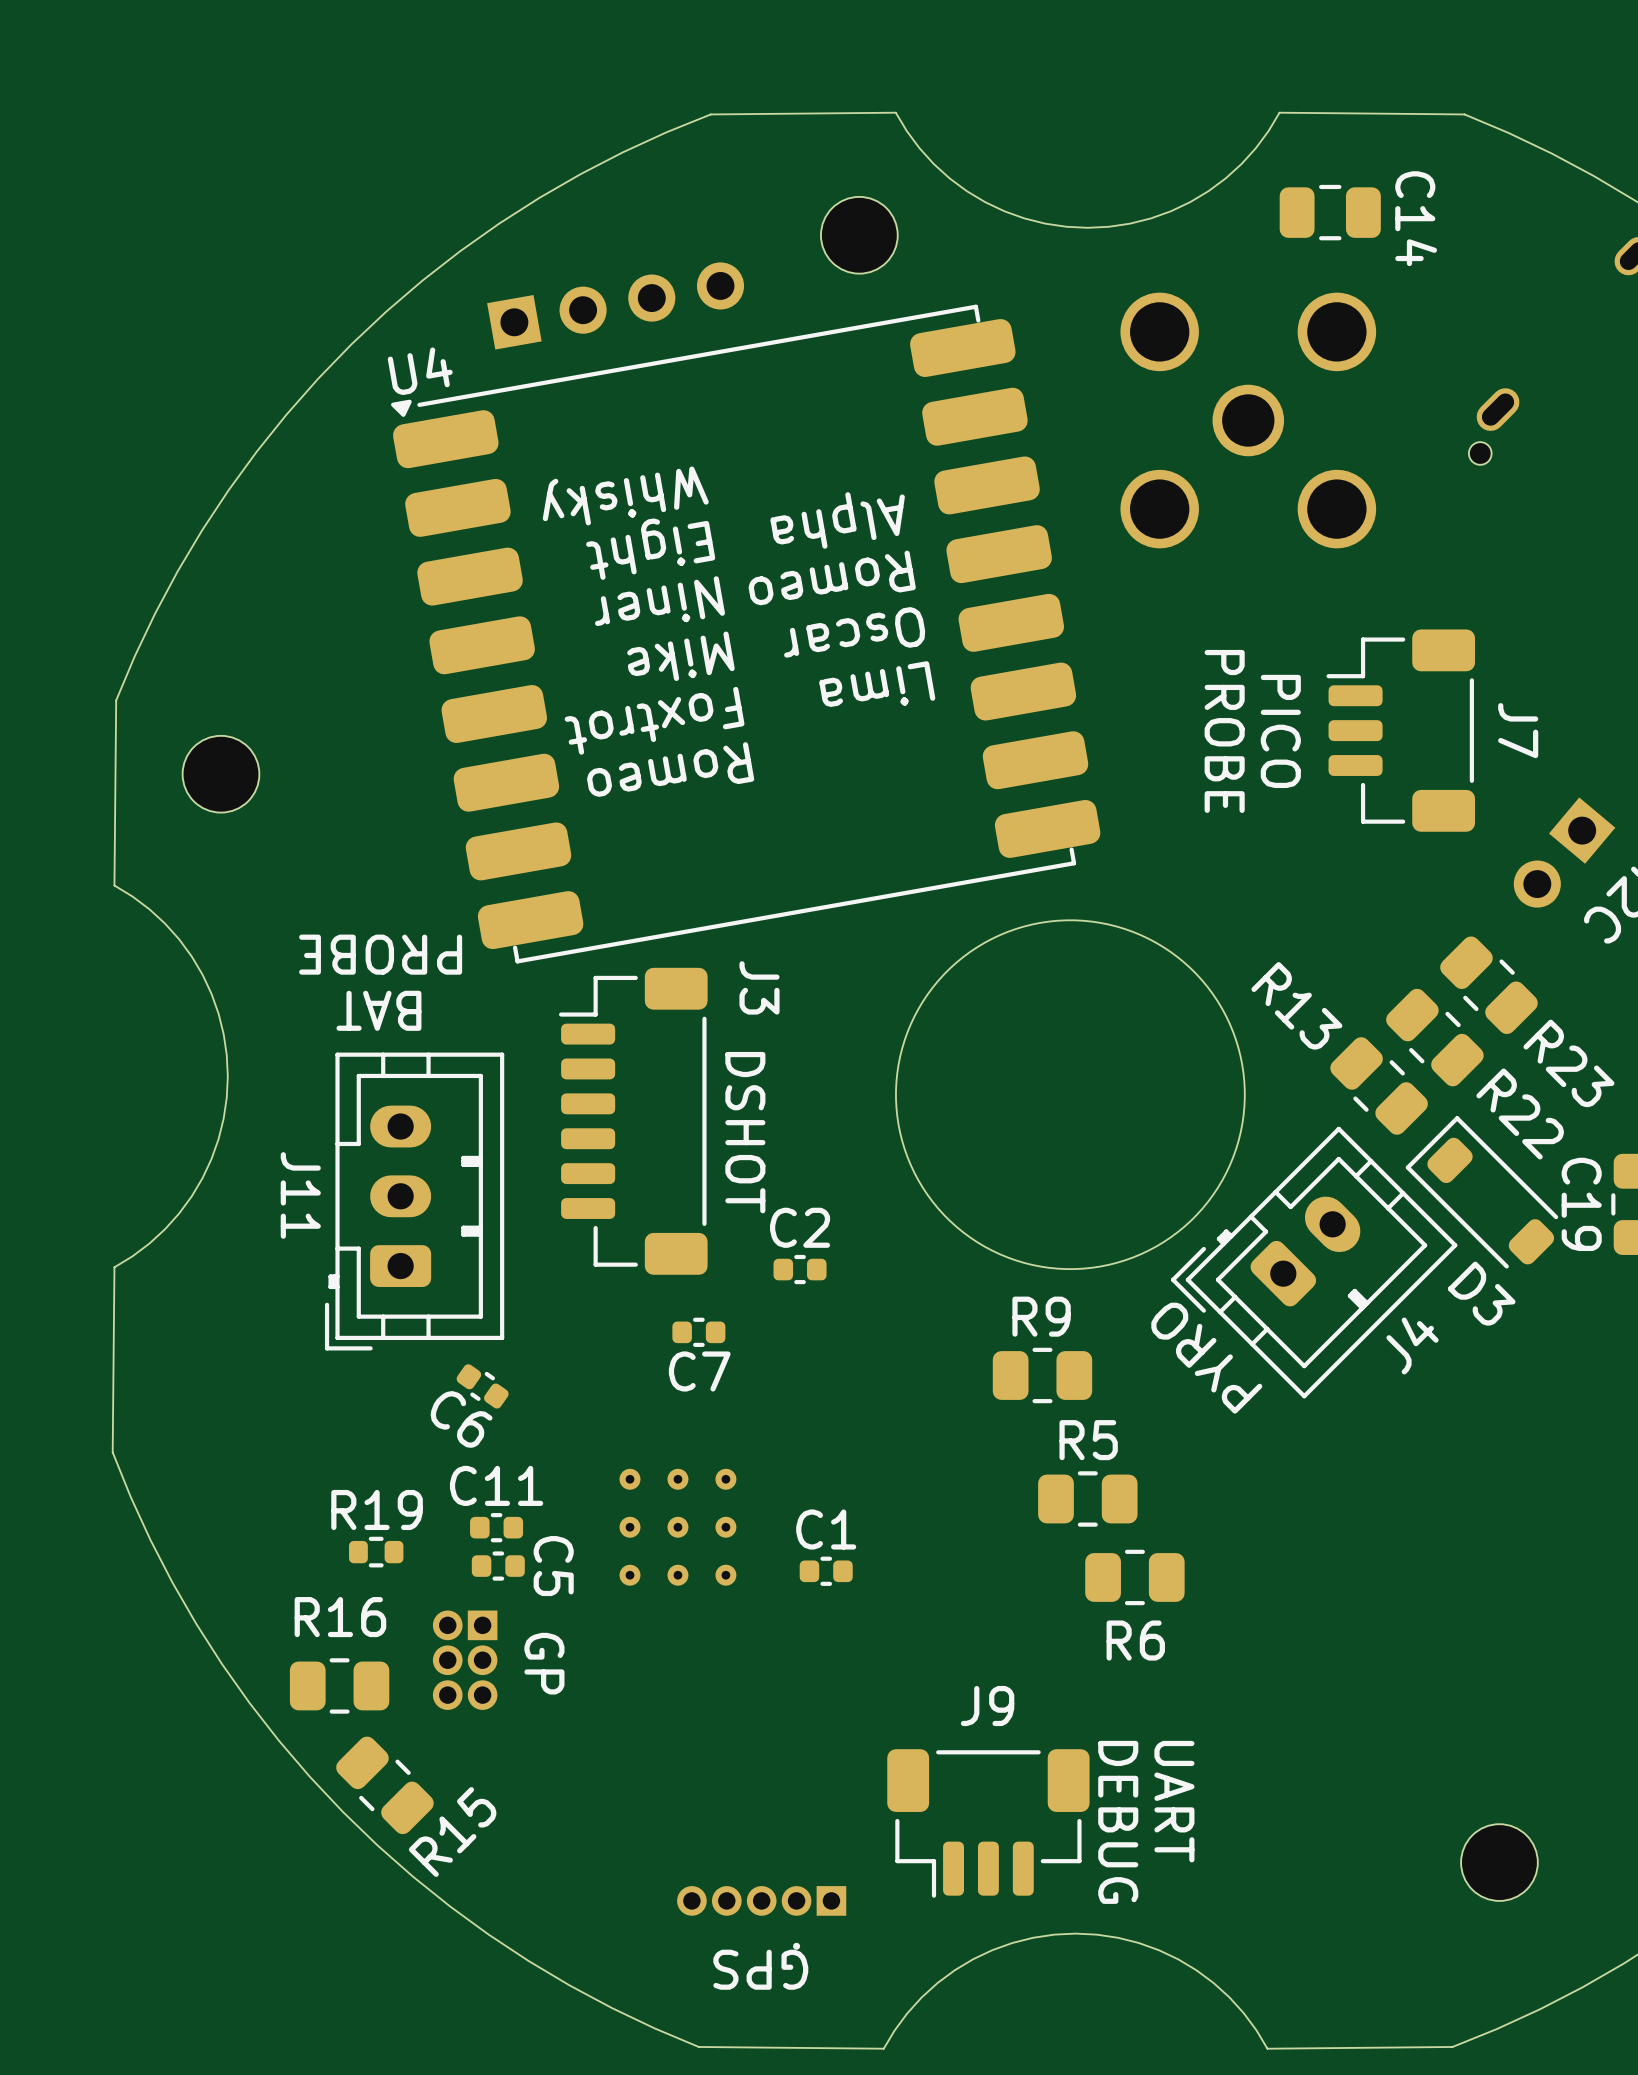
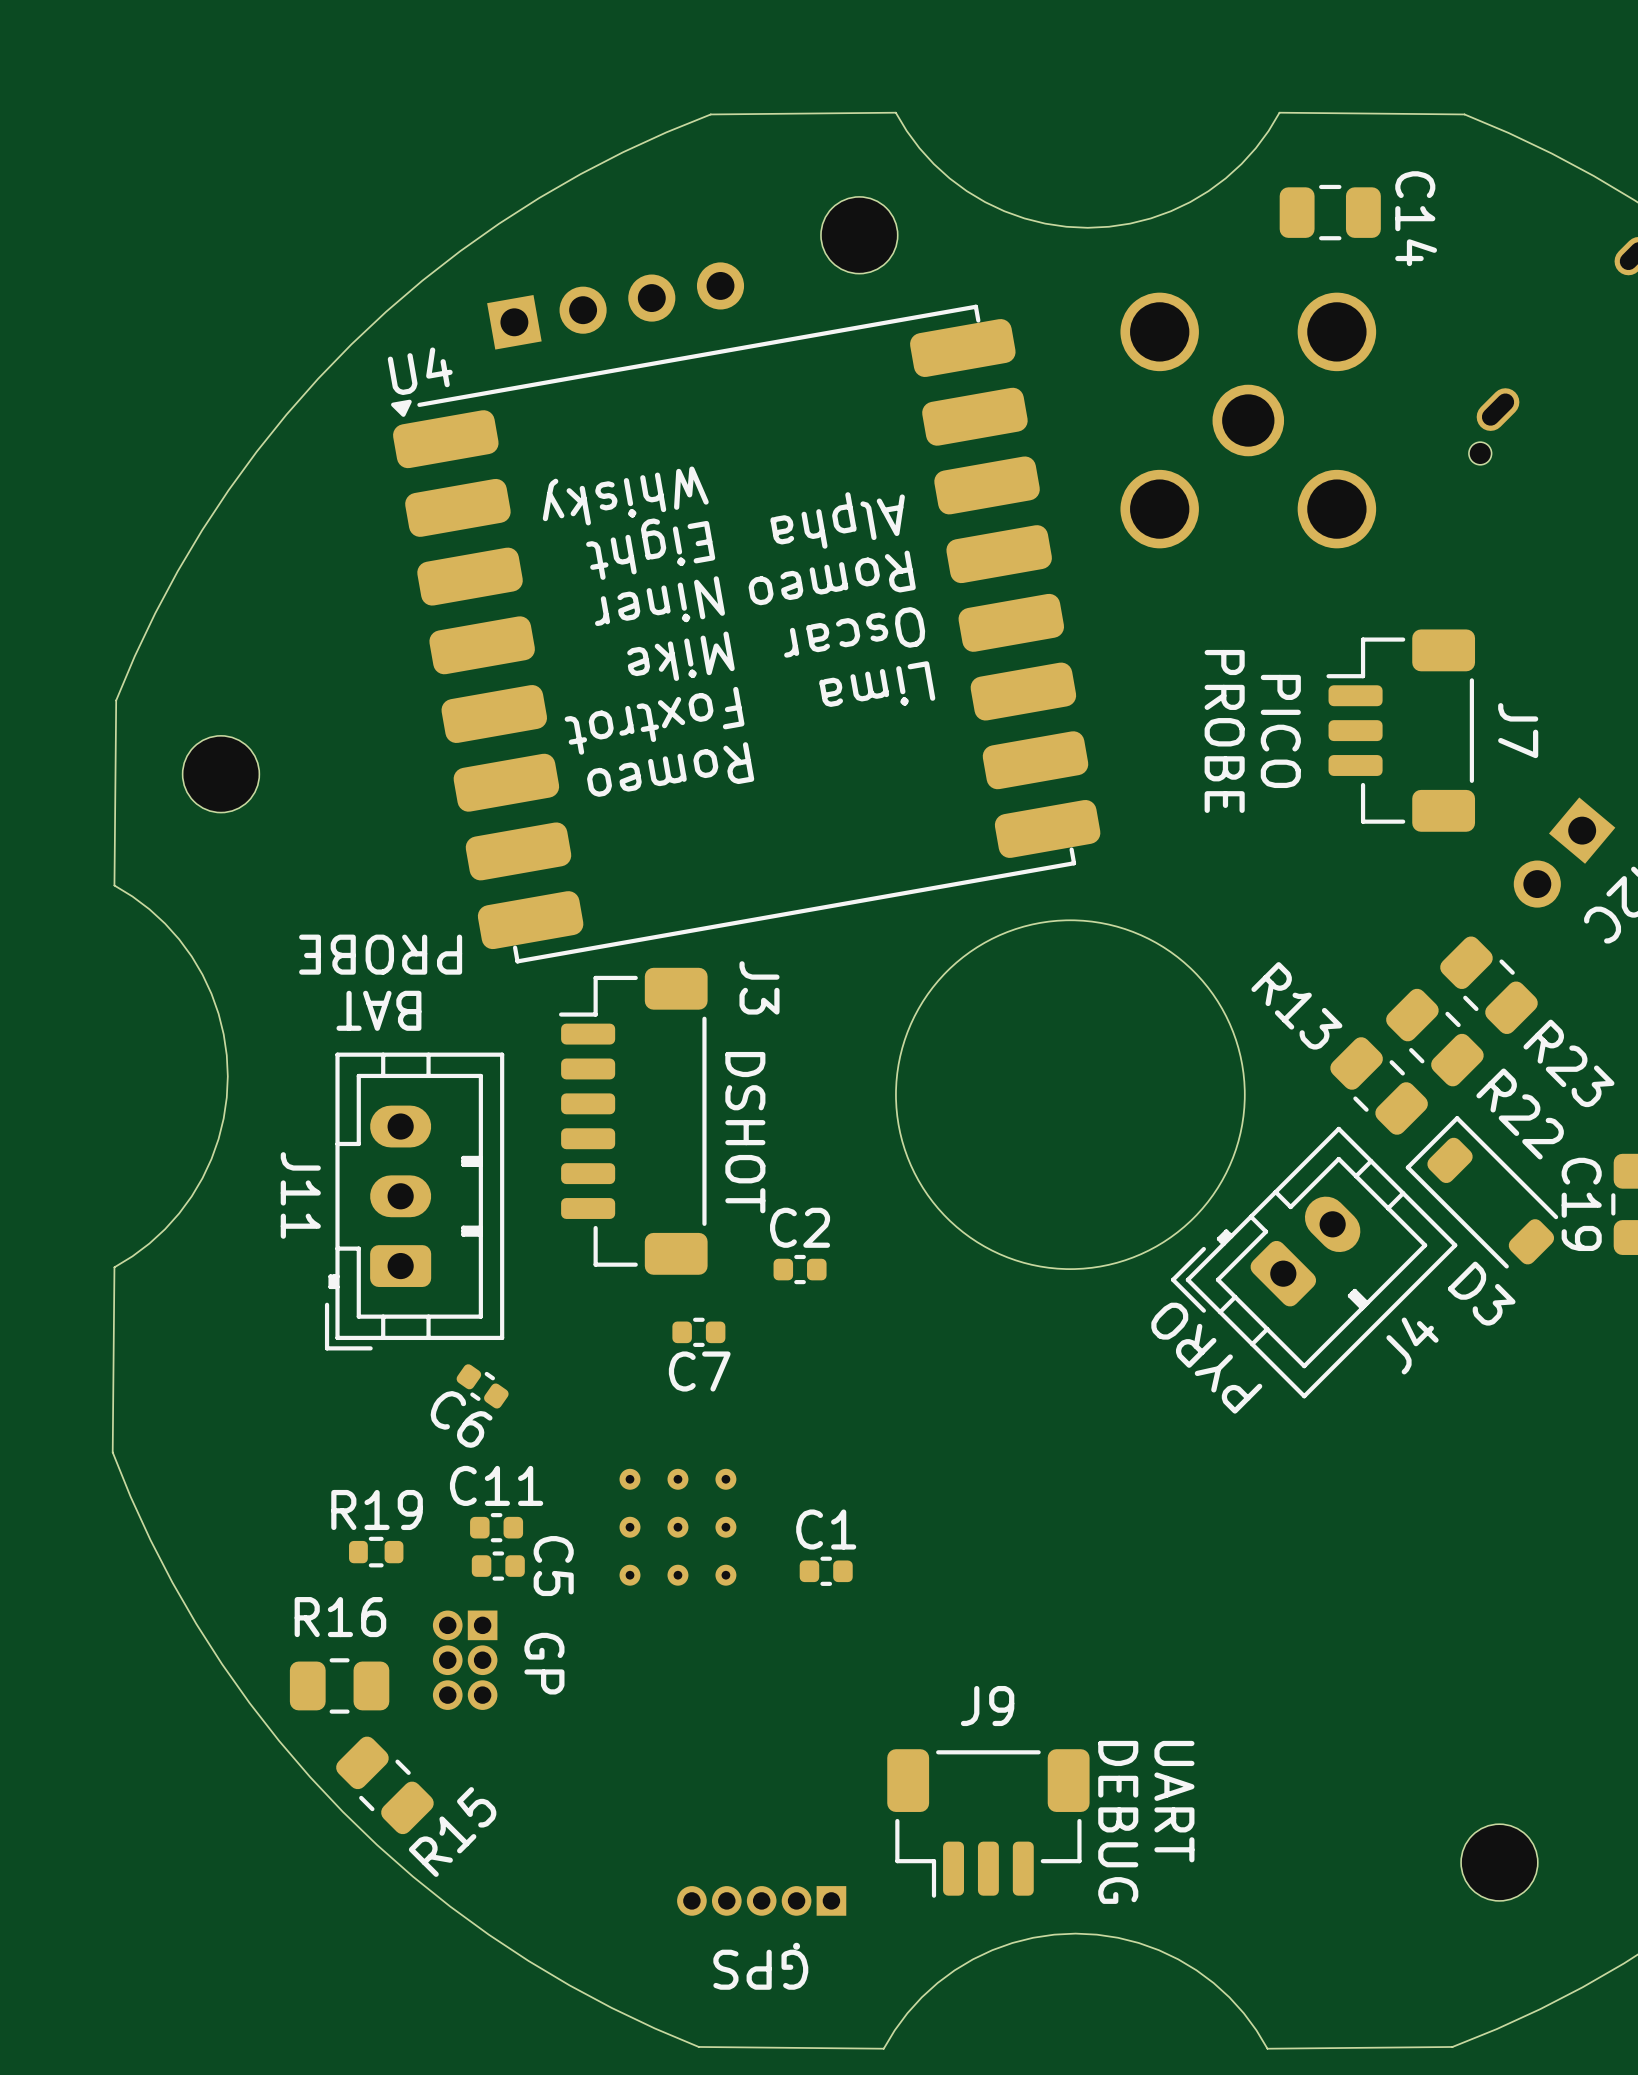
R9: (1042, 1375) -> none
R5: (1087, 1498) -> none
R6: (1134, 1577) -> none

